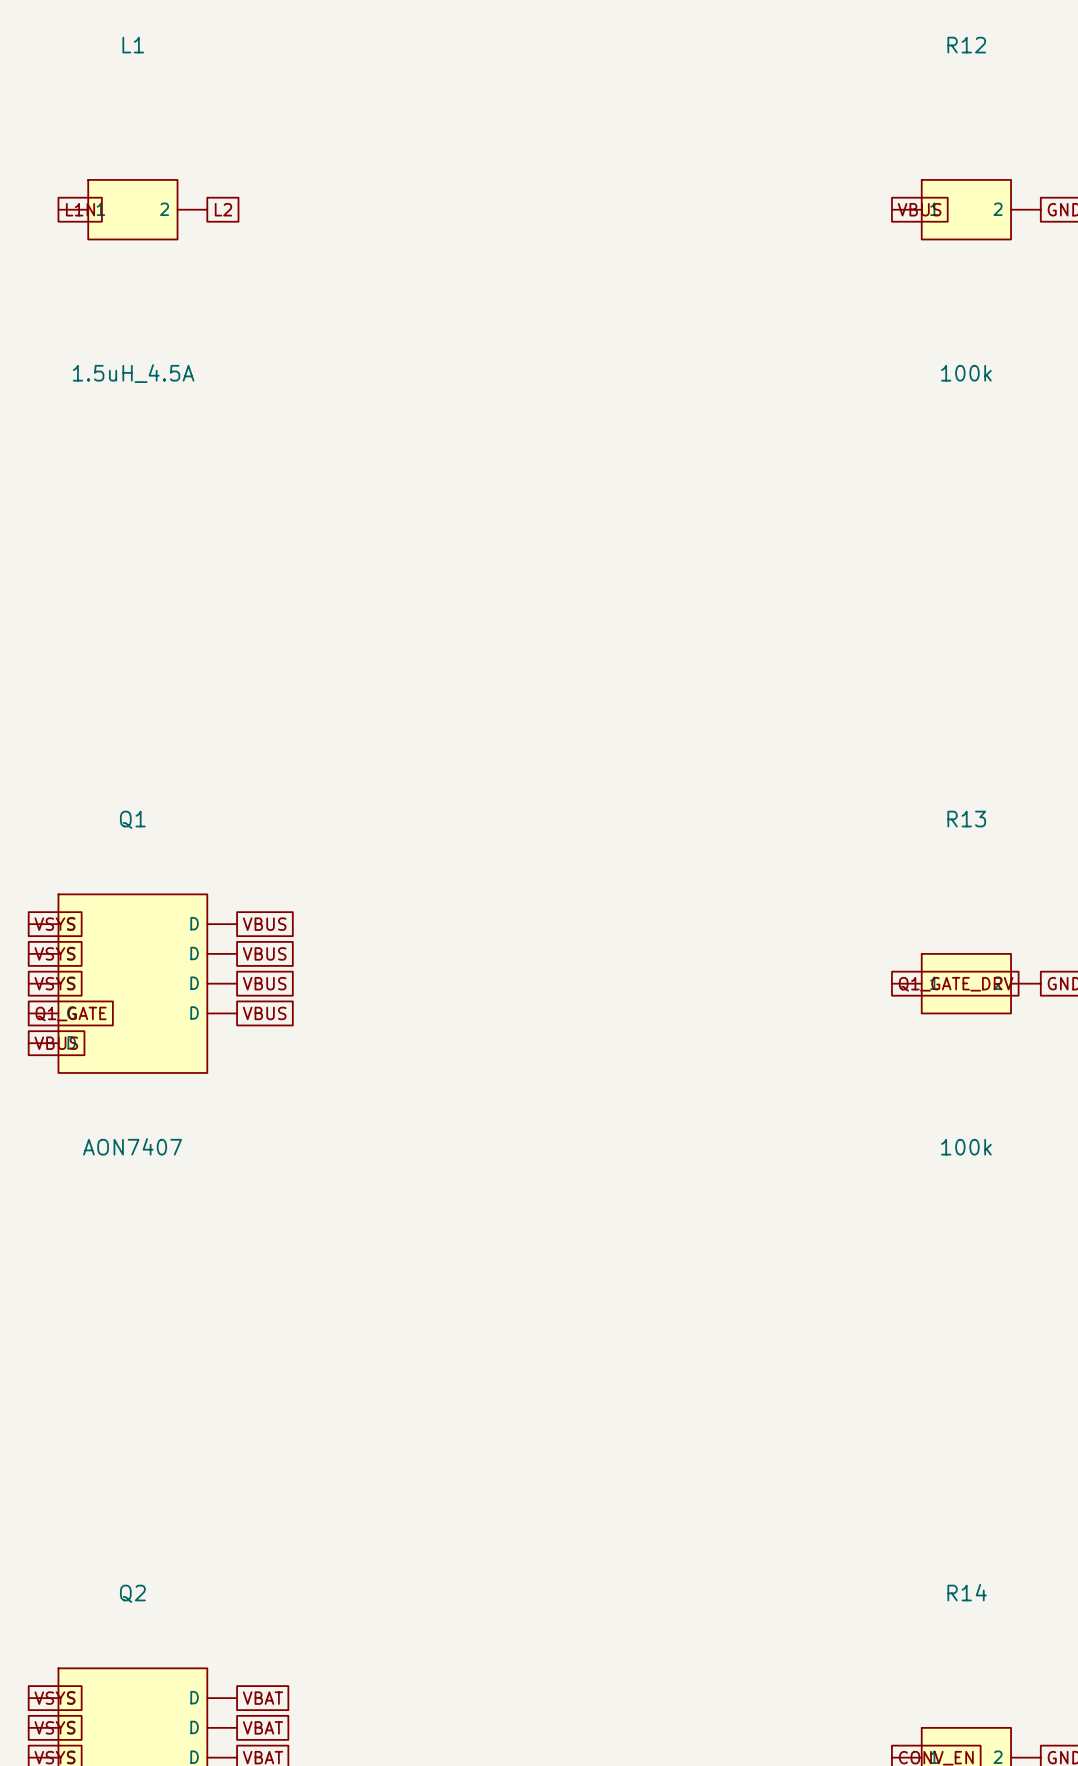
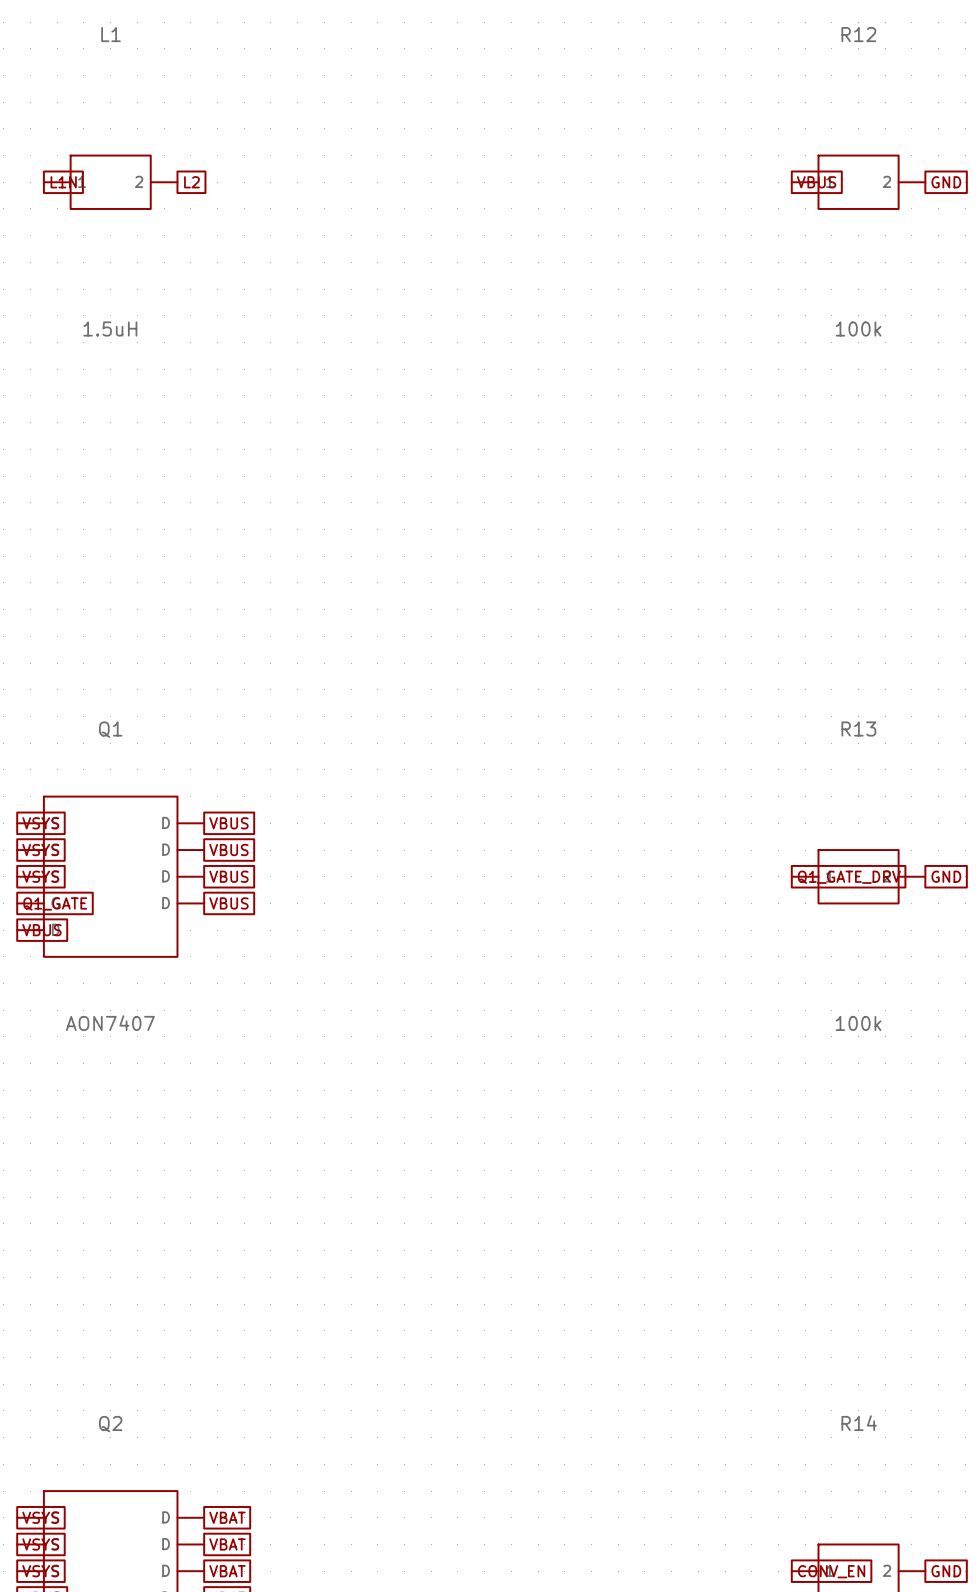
L1 value: 1.5uH_4.5A (133, 373) -> 1.5uH (110, 328)

